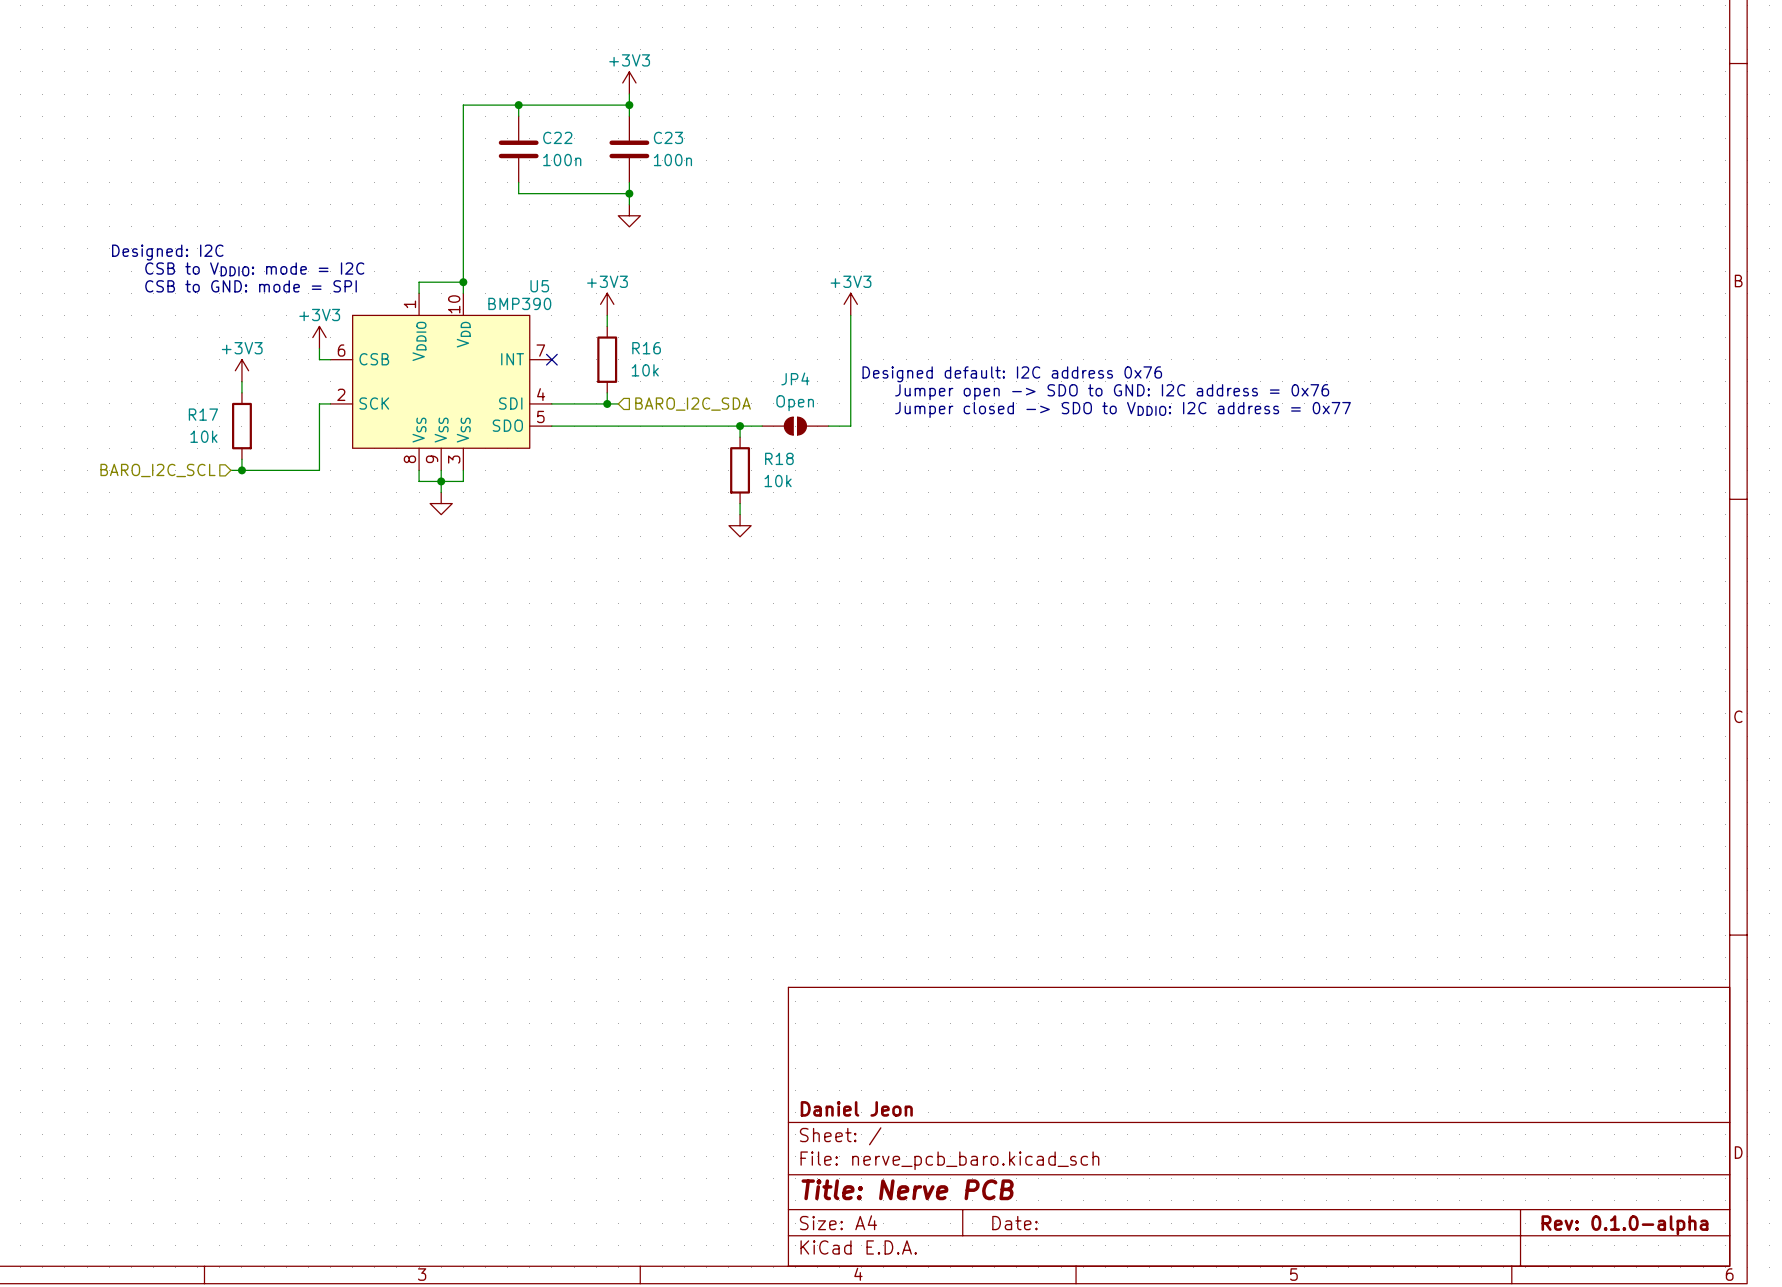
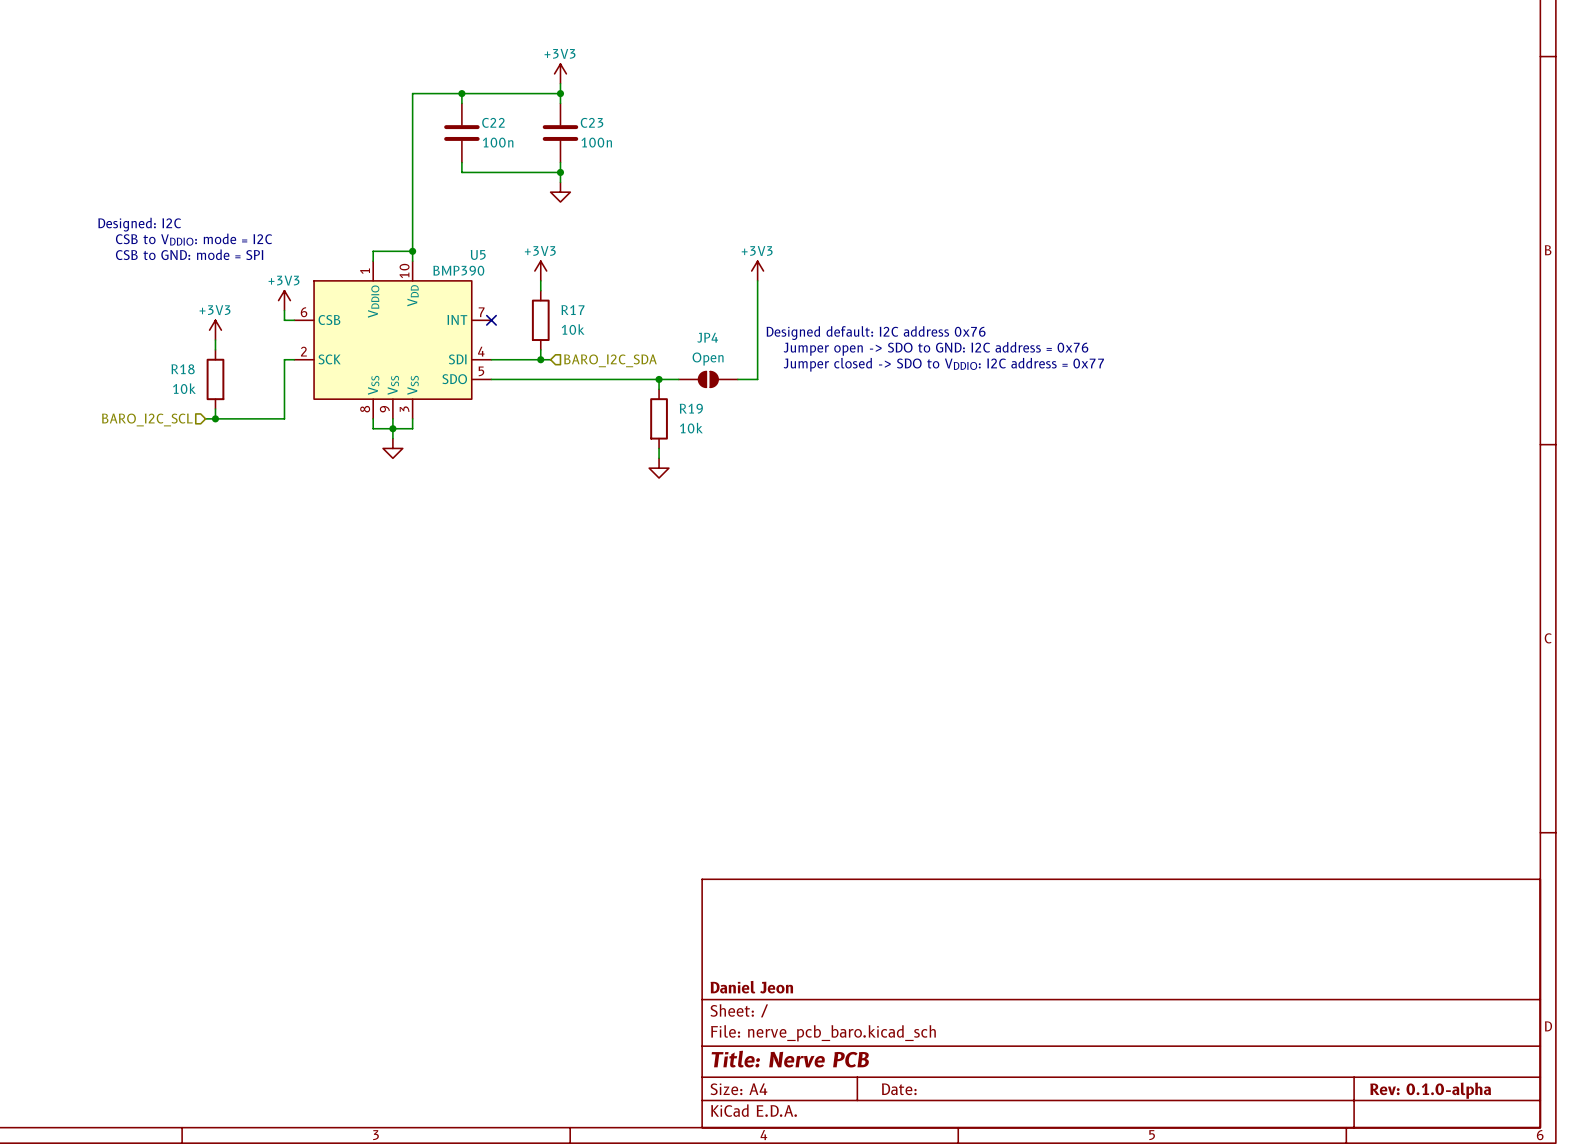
R16 name: R16 (646, 348) -> R17 (572, 310)
R17 name: R17 (203, 414) -> R18 (183, 369)
R18 name: R18 (779, 458) -> R19 (691, 408)

